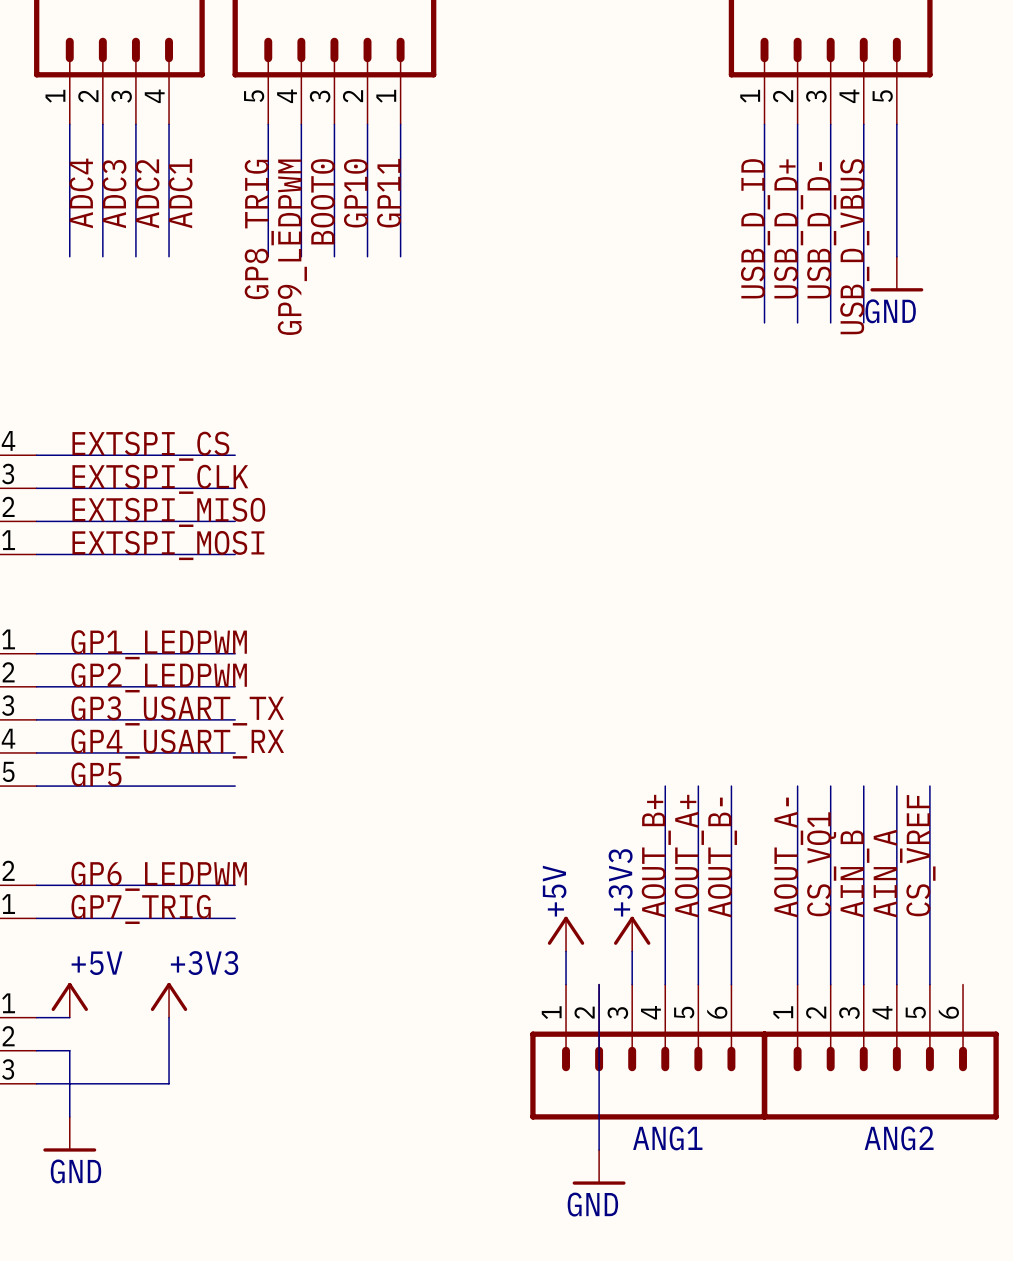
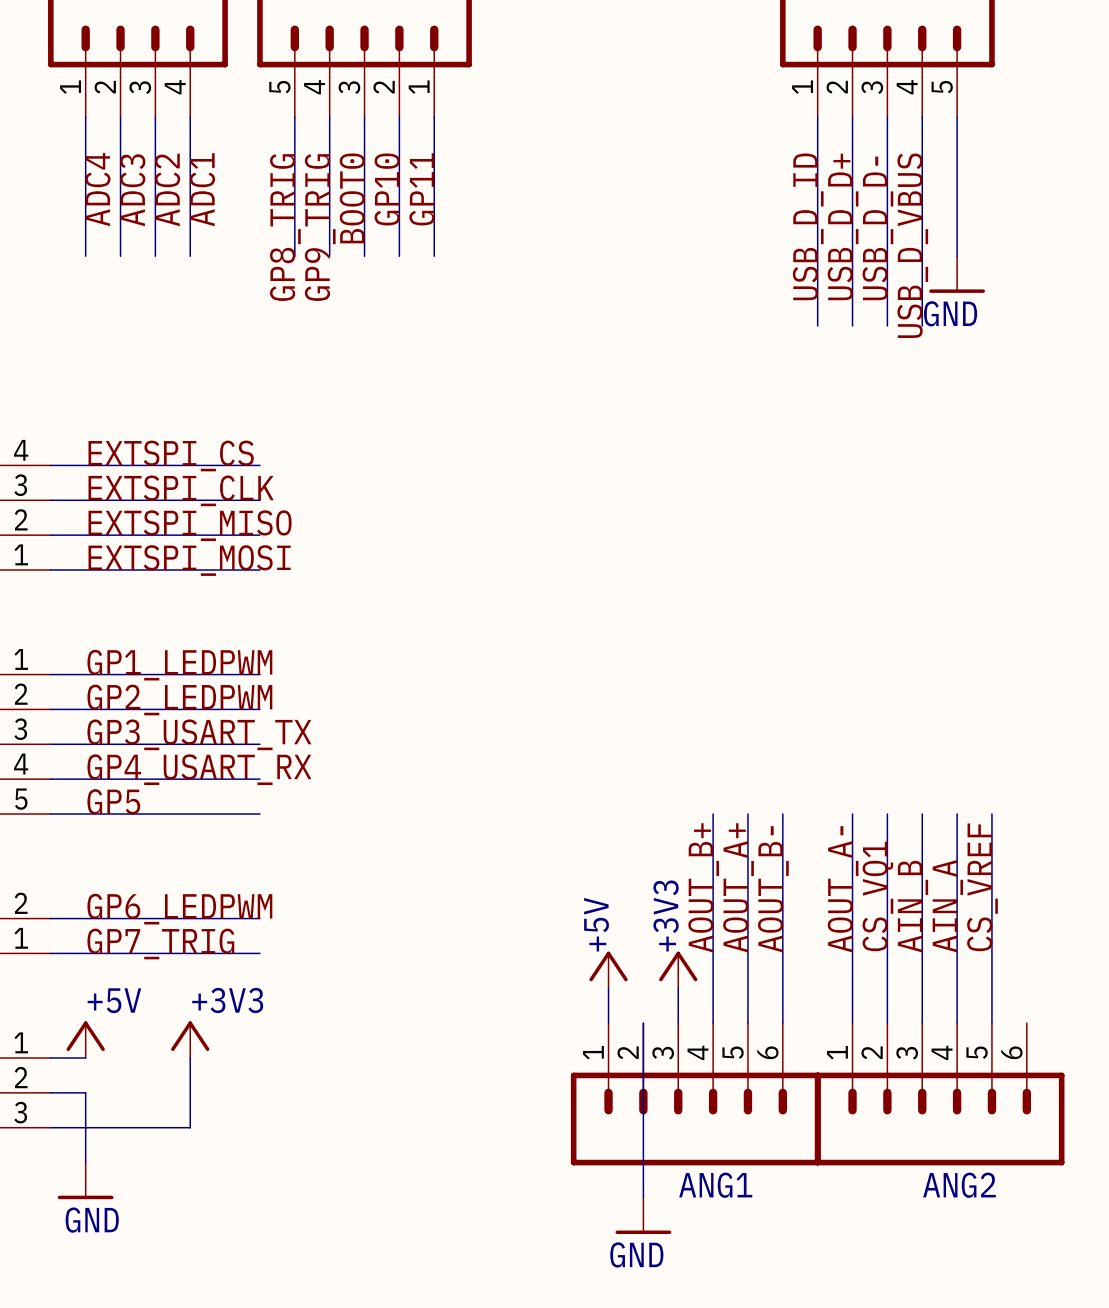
label: GP9_LEDPWM (292, 247) -> GP9_TRIG (320, 227)

